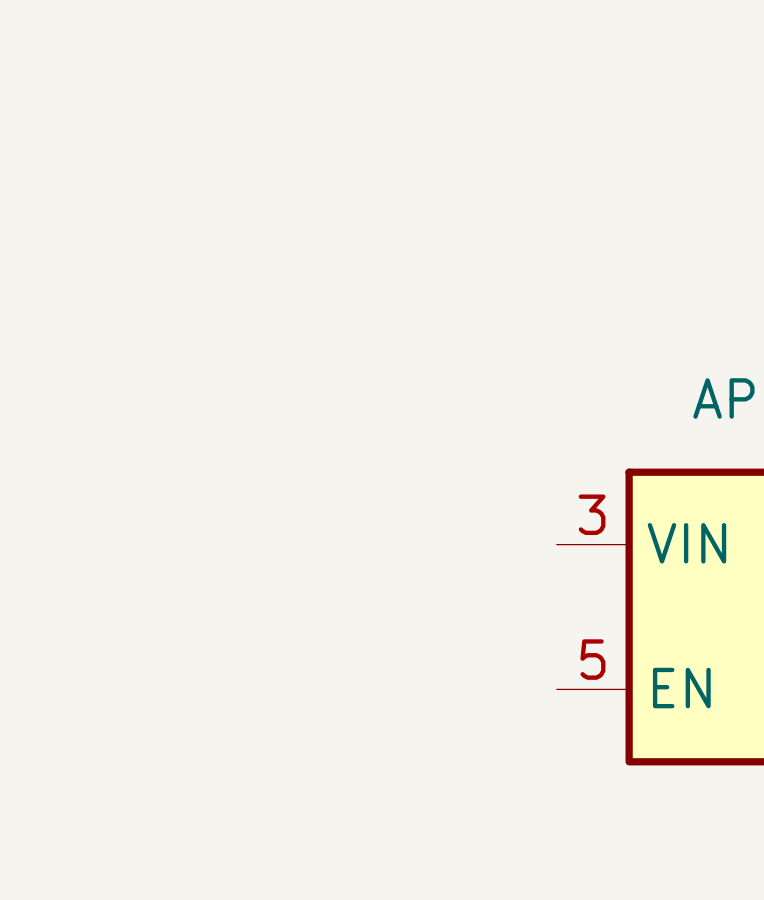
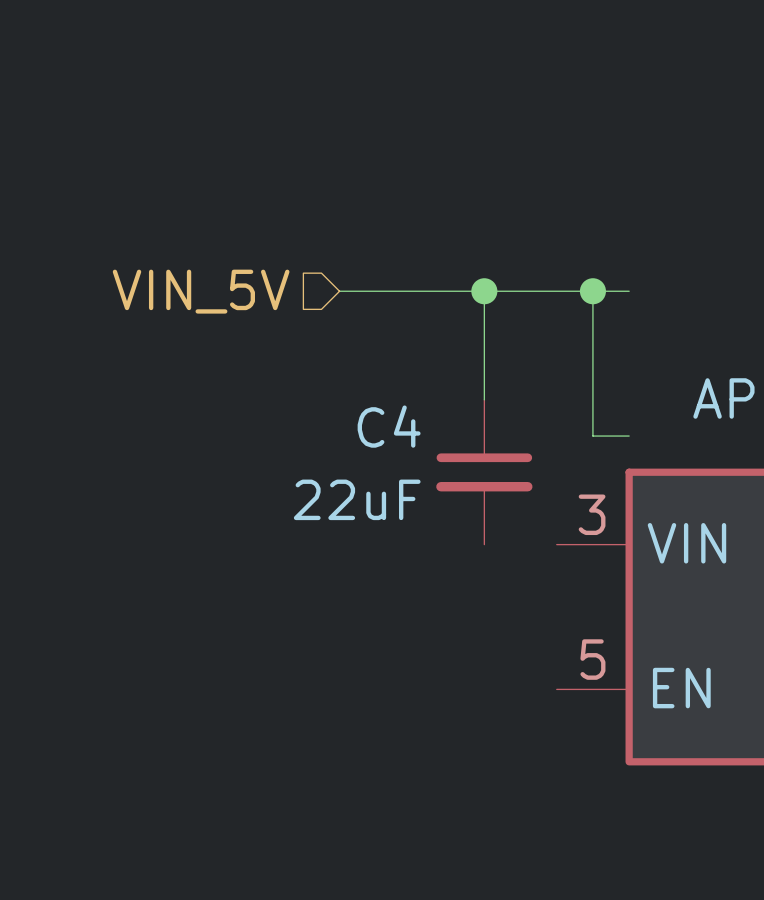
hierarchical label: none -> VIN_5V (201, 291)
wire: none -> (339, 291) (629, 291)
wire: none -> (484, 291) (484, 399)
junction: none -> (484, 291)
wire: none -> (592, 291) (592, 436) (629, 436)
junction: none -> (592, 291)
C4: none -> 22uF (484, 472)

